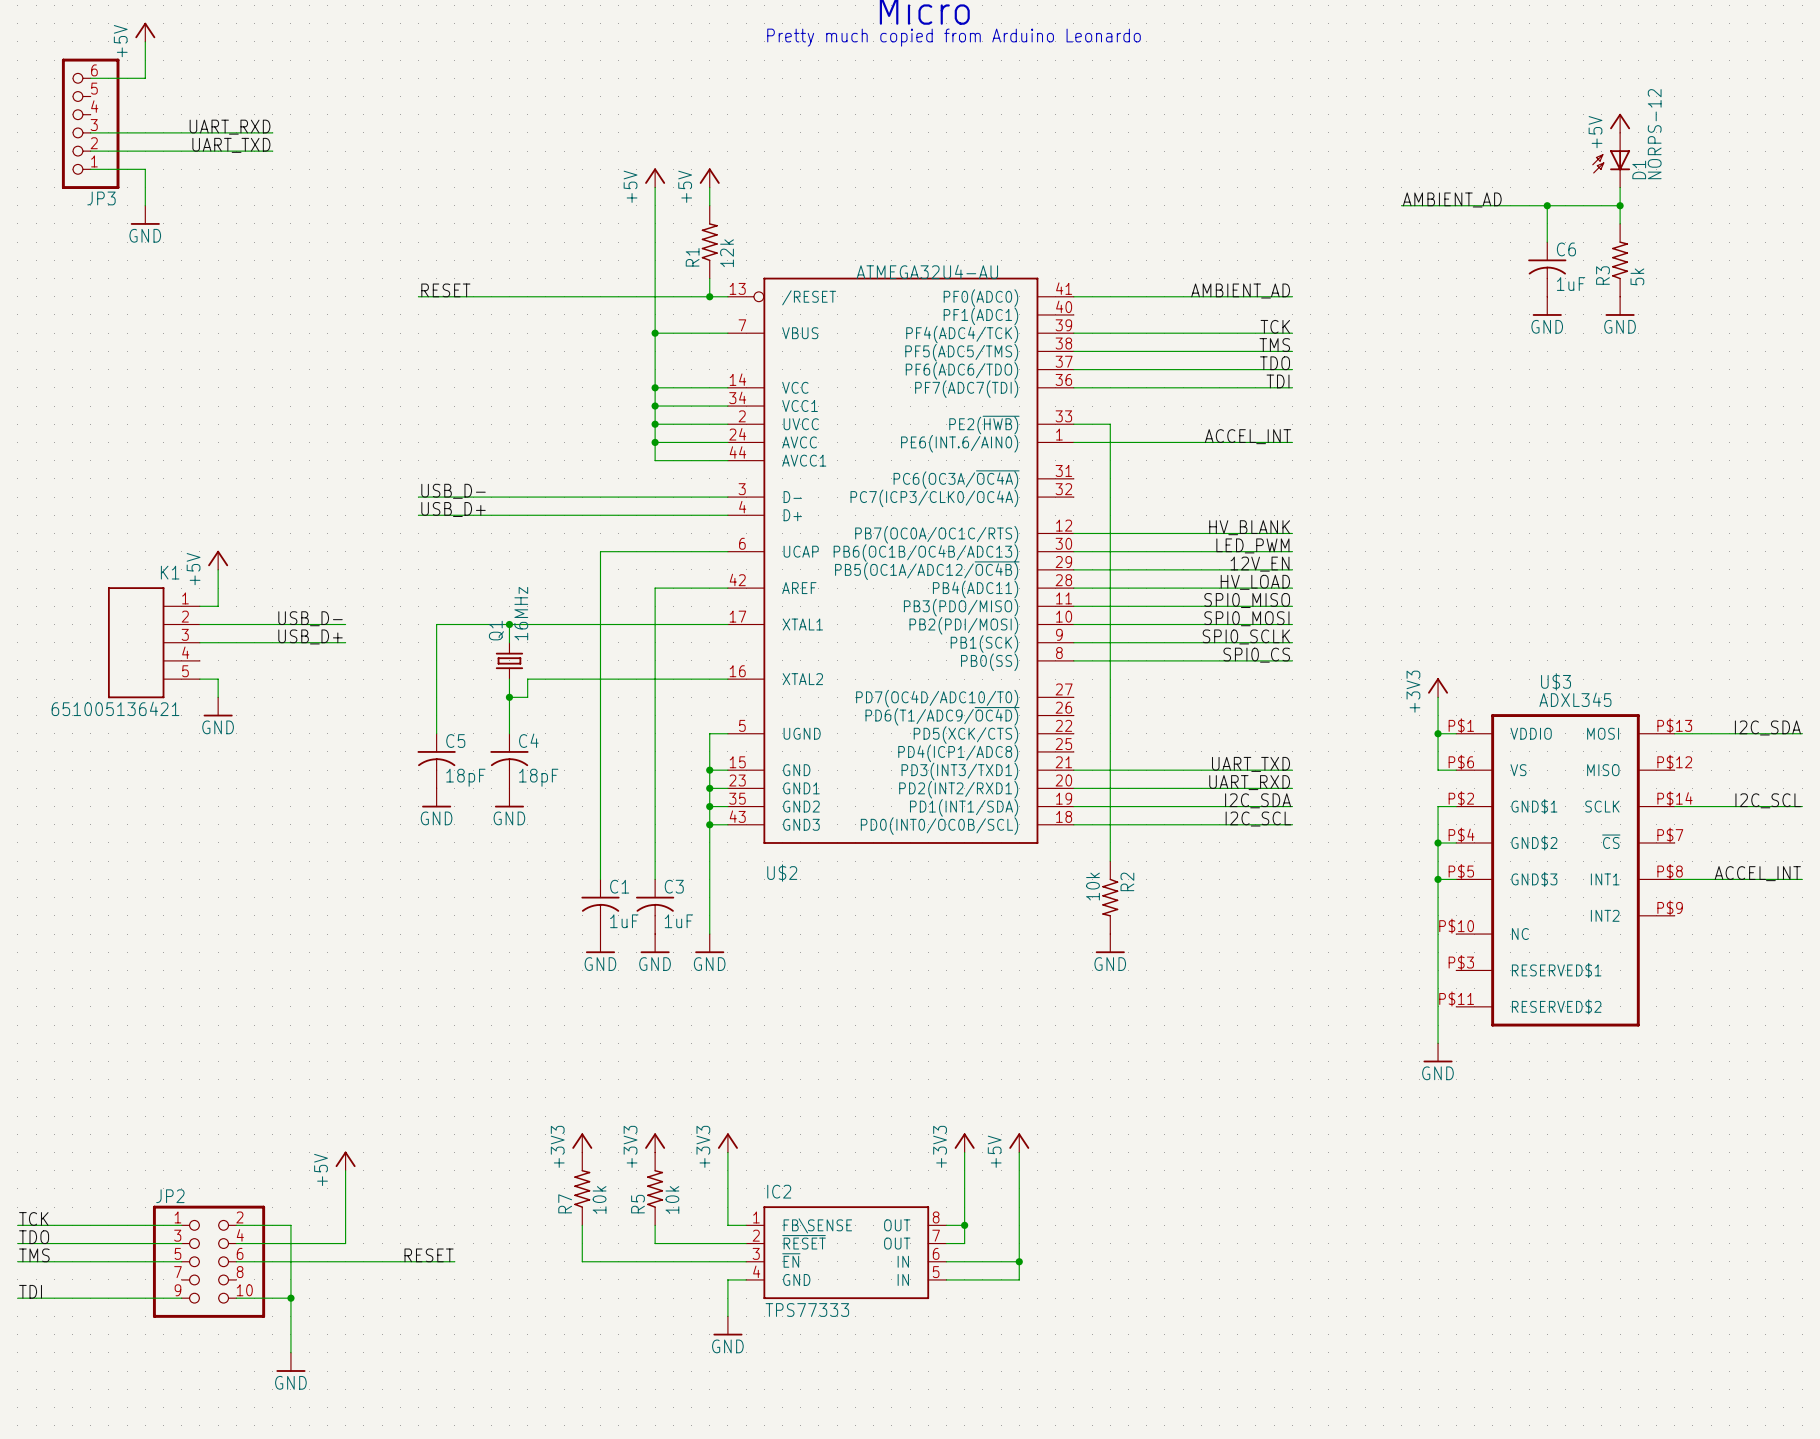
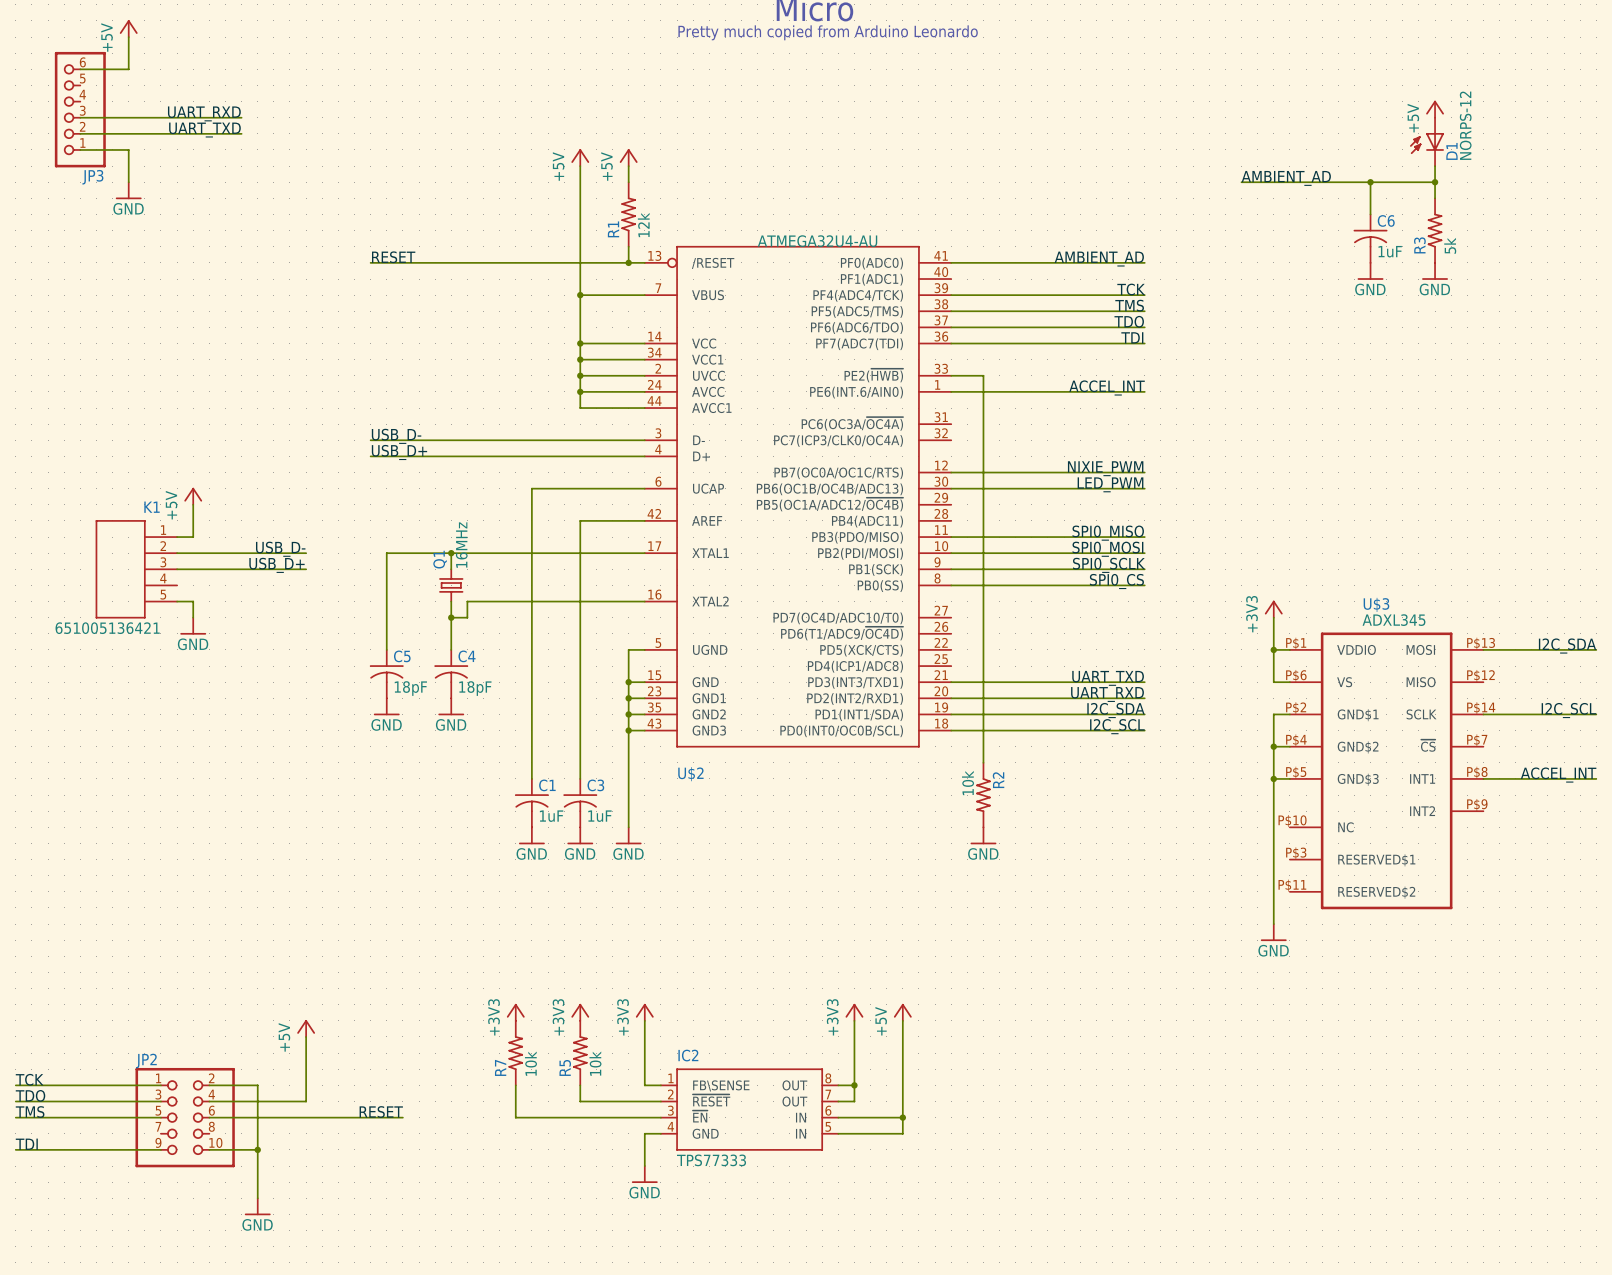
label: HV_BLANK (1249, 527) -> NIXIE_PWM (1105, 468)
label: 12V_EN (1260, 564) -> none
wire: (1073, 569) (1292, 569) -> none
label: HV_LOAD (1255, 582) -> none
wire: (1073, 588) (1292, 588) -> none

